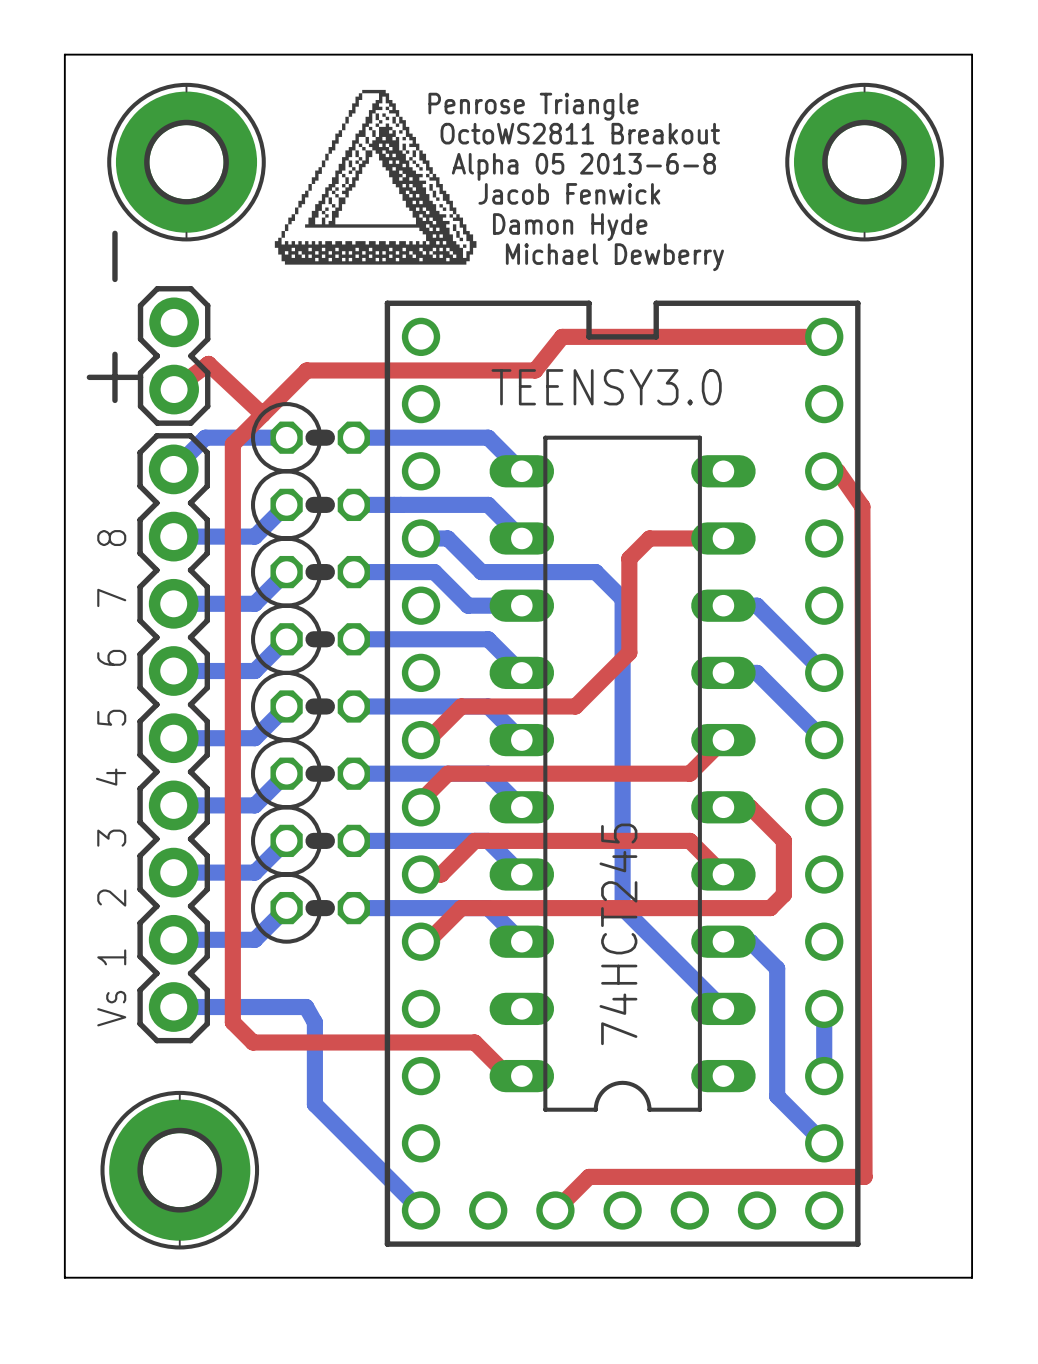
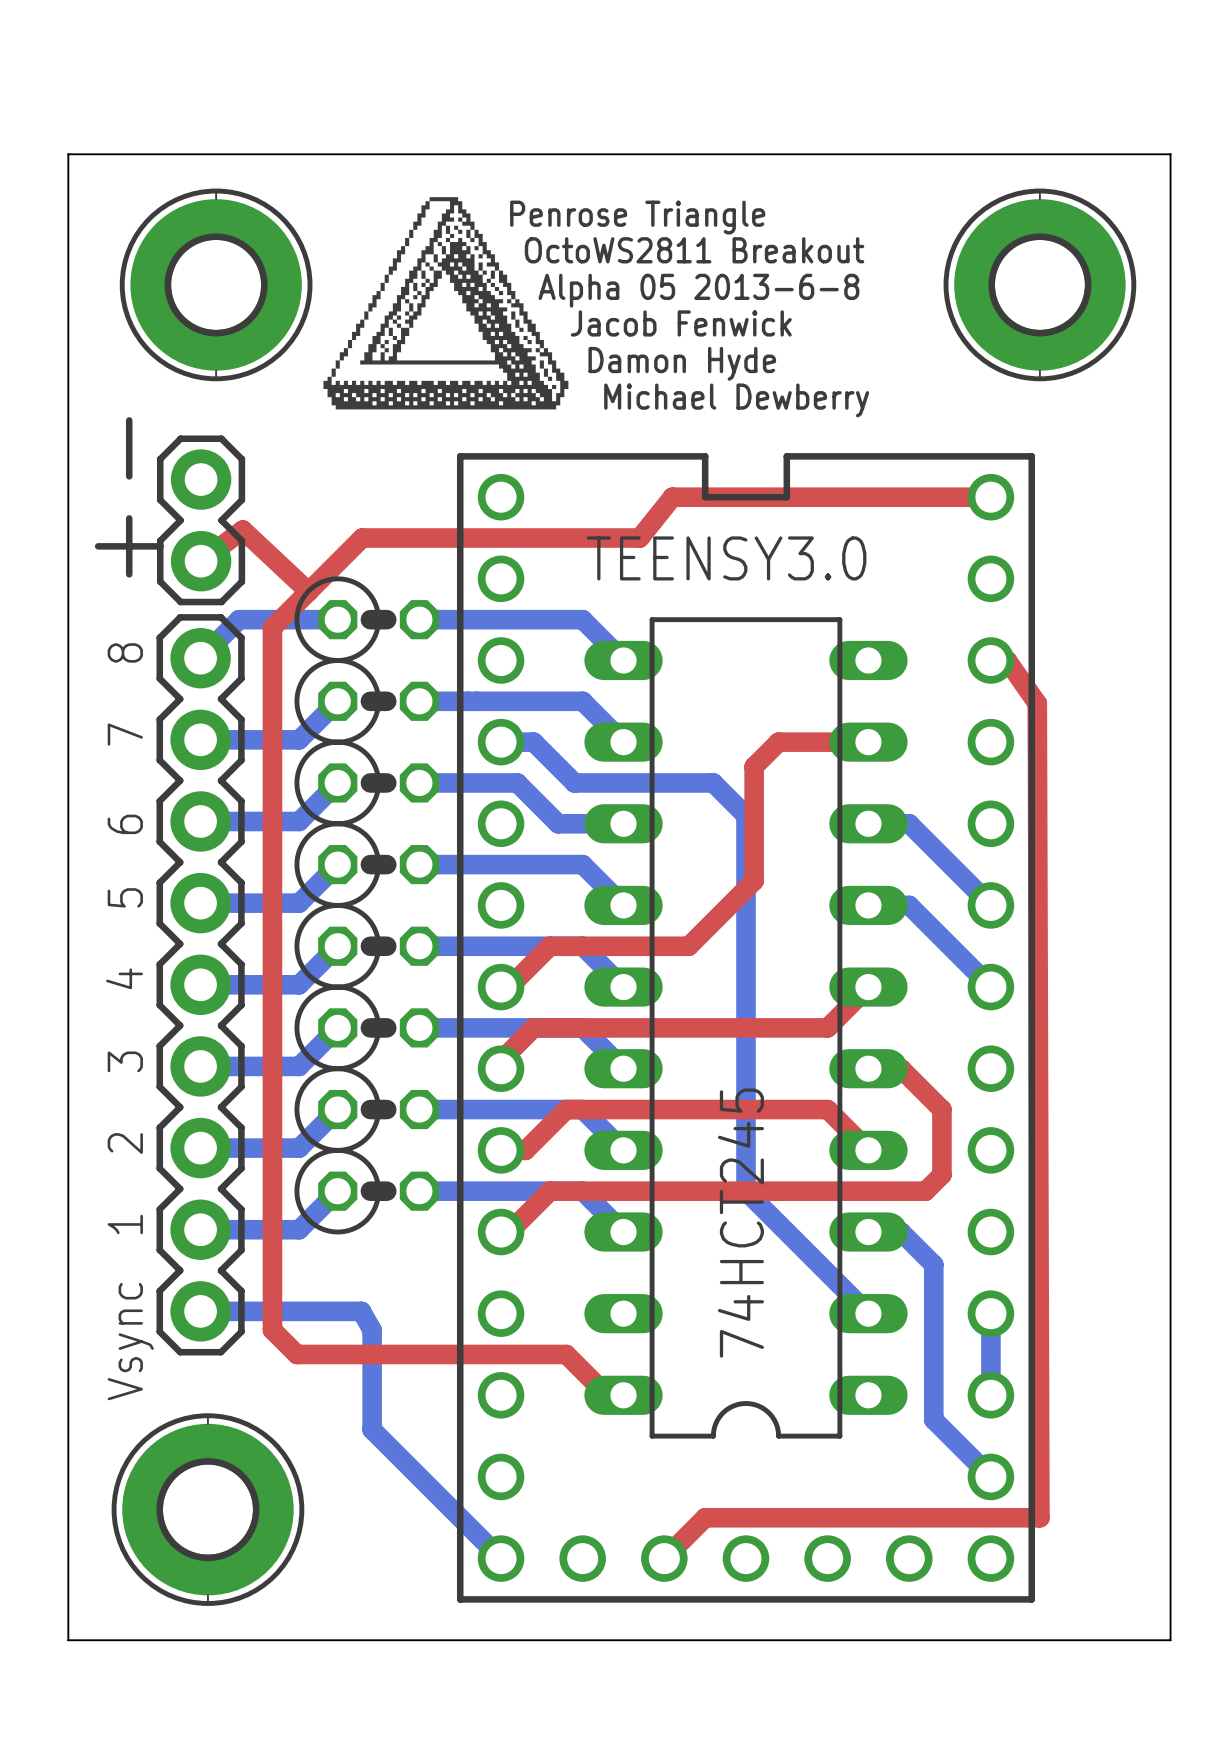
text: none -> - (129, 448)
text: + - (114, 316) -> + (129, 546)
text: none -> 8 (125, 652)
text: none -> 7 (125, 734)
text: none -> 6 (125, 824)
text: none -> 5 (125, 897)
text: none -> 4 (124, 978)
text: Vs 1 2 3 4 5 6 7 8 (111, 778) -> none
text: none -> 3 (125, 1061)
text: none -> 2 (125, 1143)
text: none -> 1 (125, 1224)
text: none -> Vsync (130, 1341)

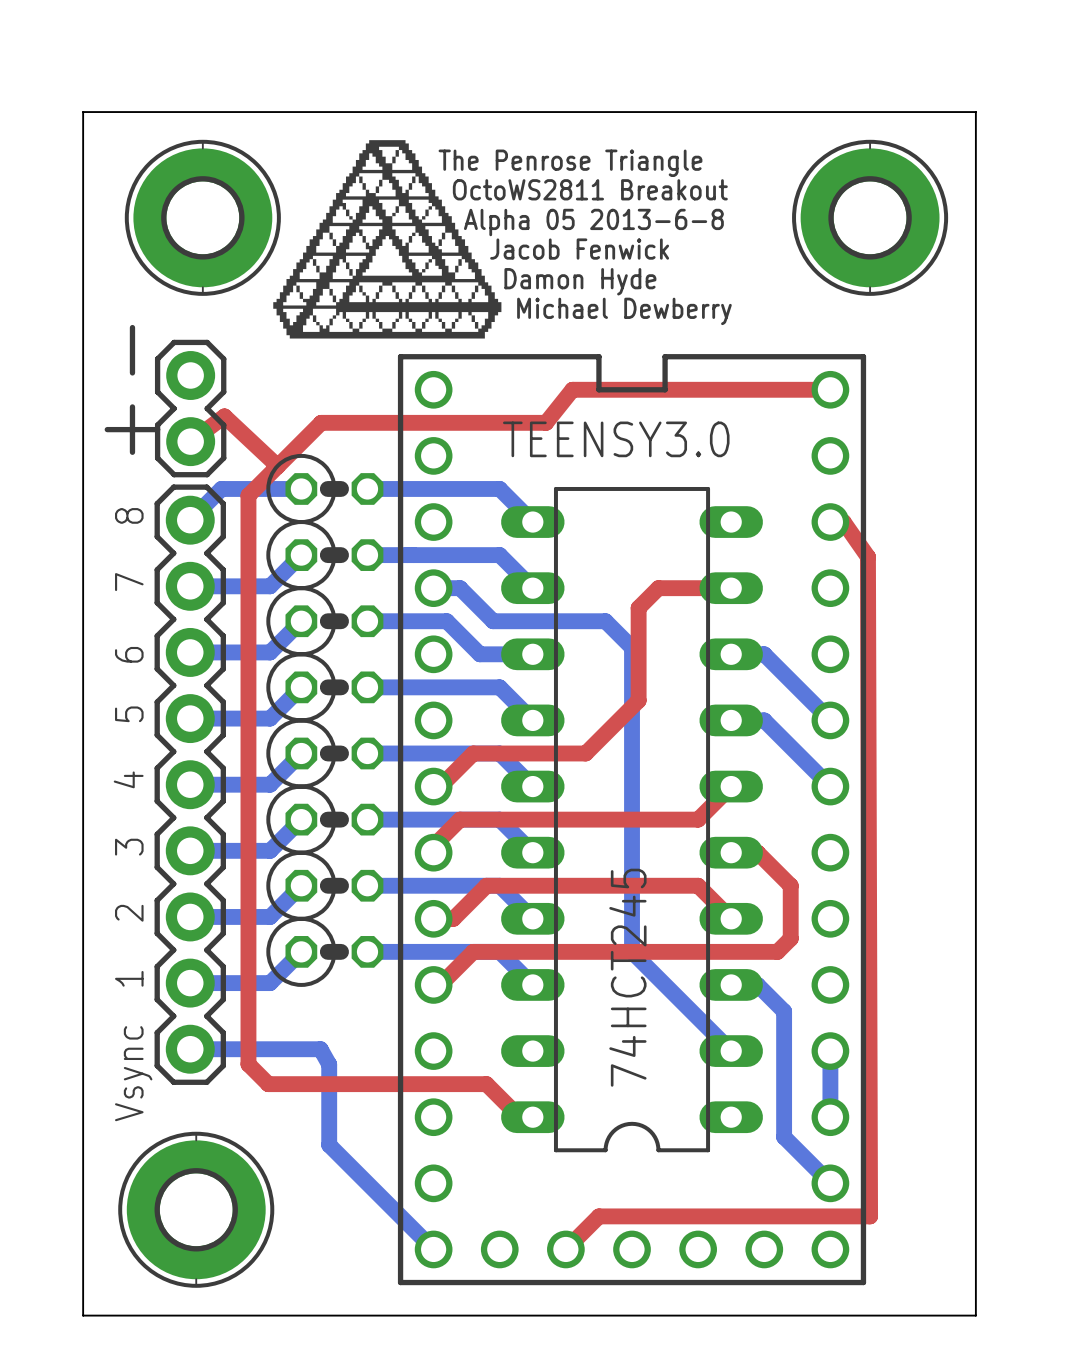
drawing shape: [323, 197, 569, 410] -> [273, 140, 502, 339]
text: Penrose Triangle (637, 217) -> The Penrose Triangle (570, 163)

